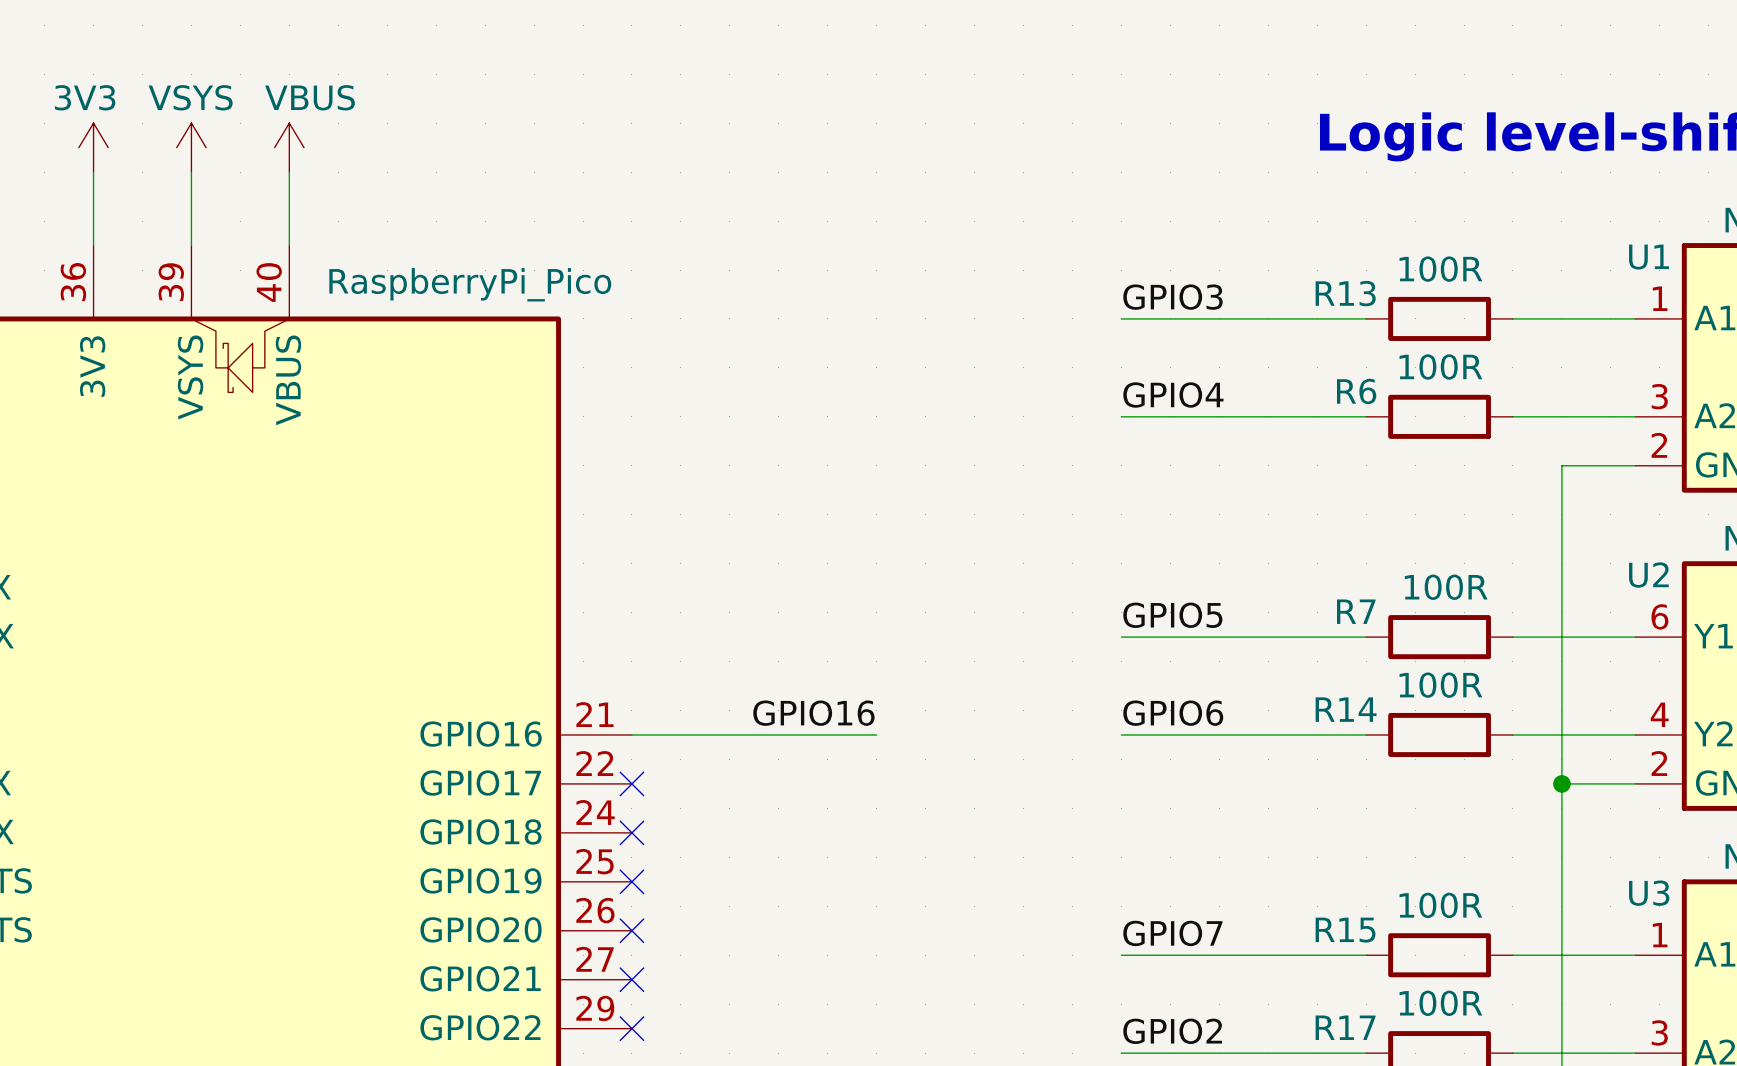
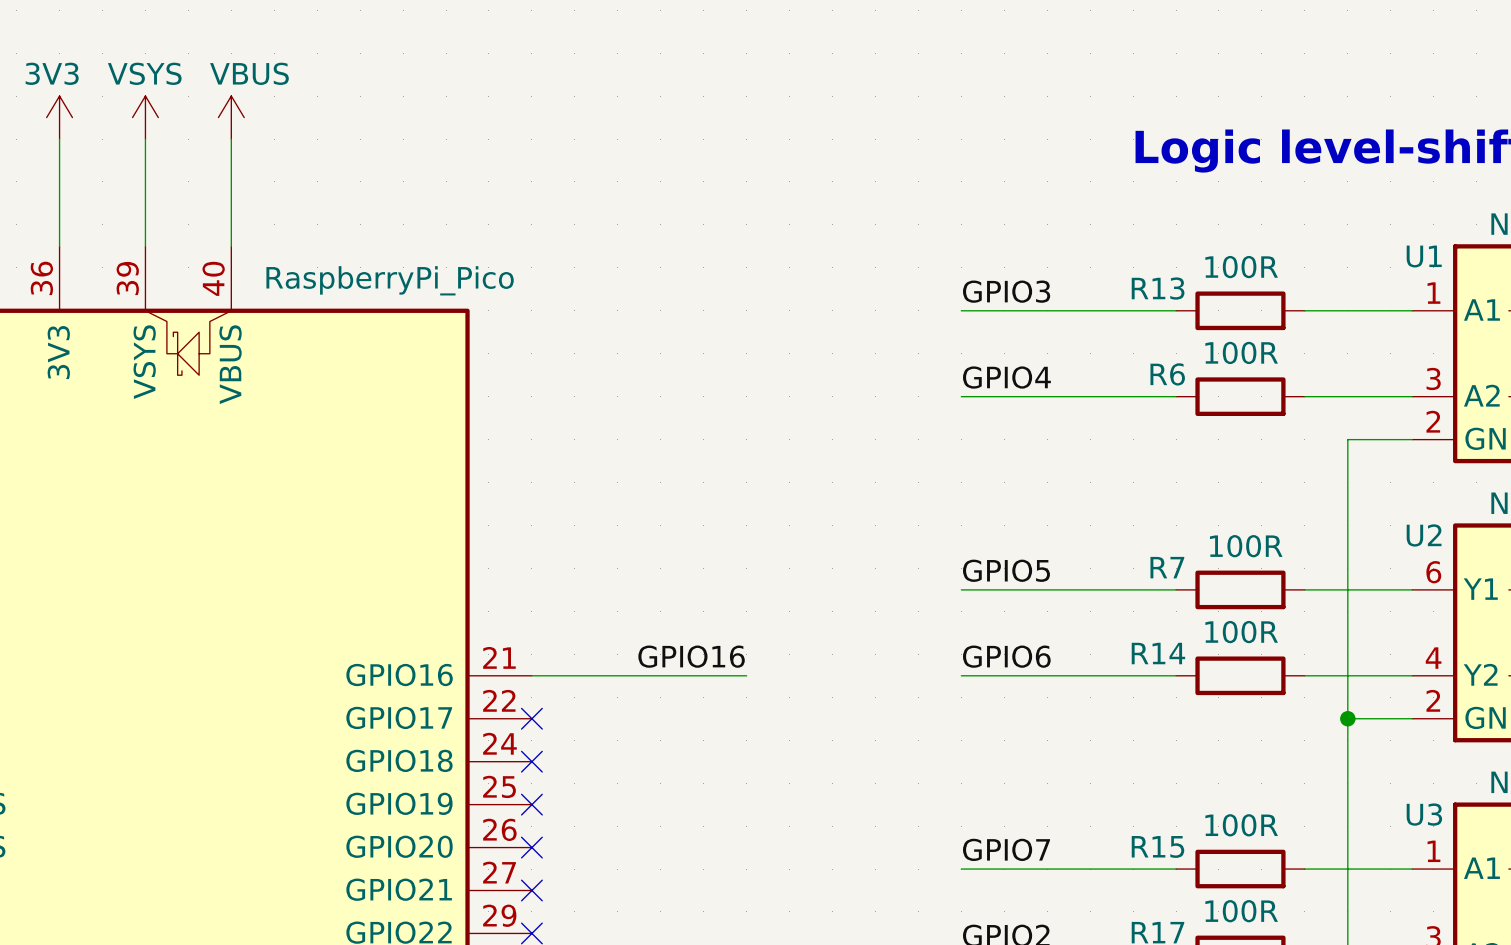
power symbol position: 3V3 (93, 147) -> 3V3 (59, 117)
power symbol position: VSYS (191, 147) -> VSYS (145, 117)
power symbol position: VBUS (289, 147) -> VBUS (231, 117)

